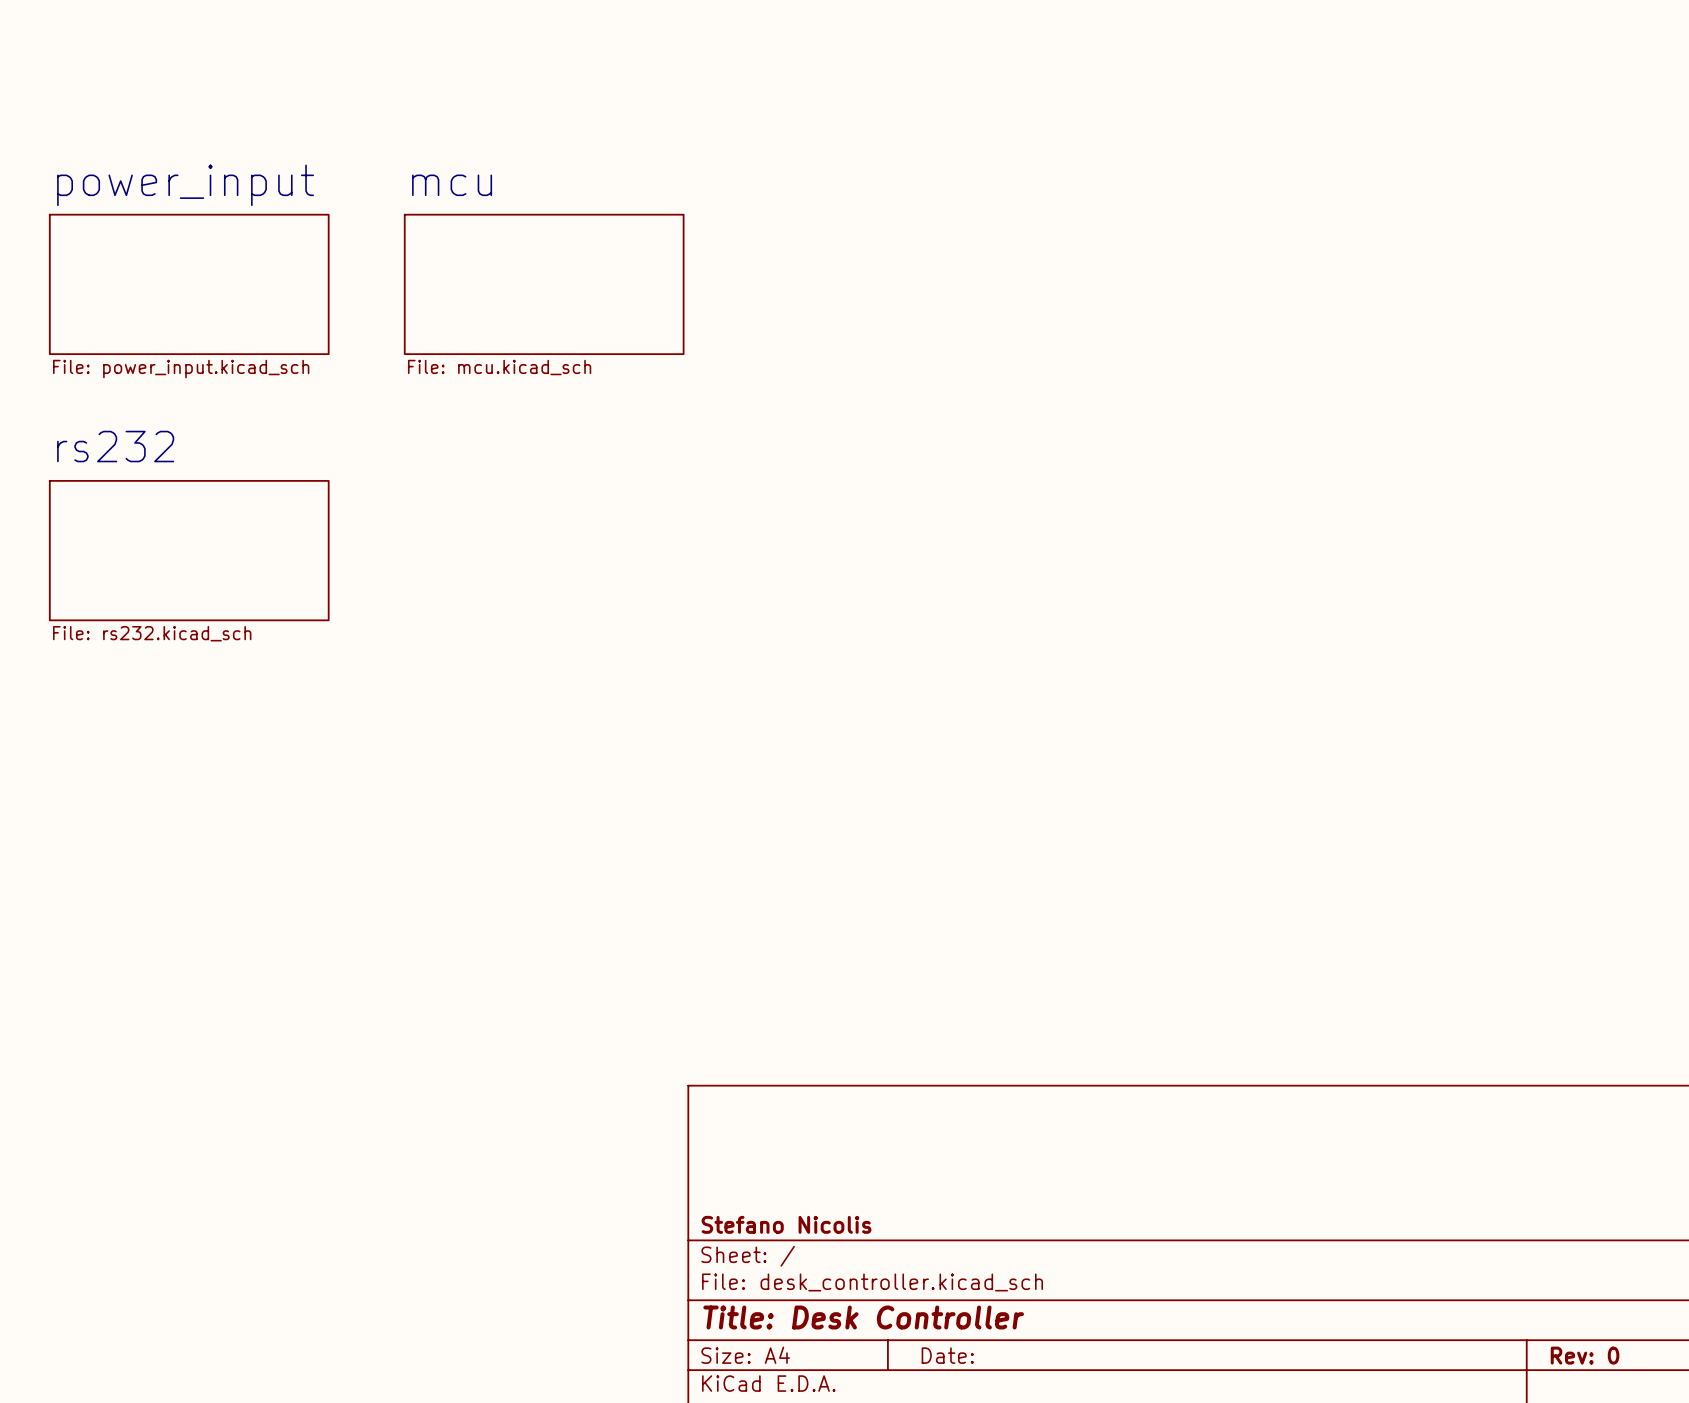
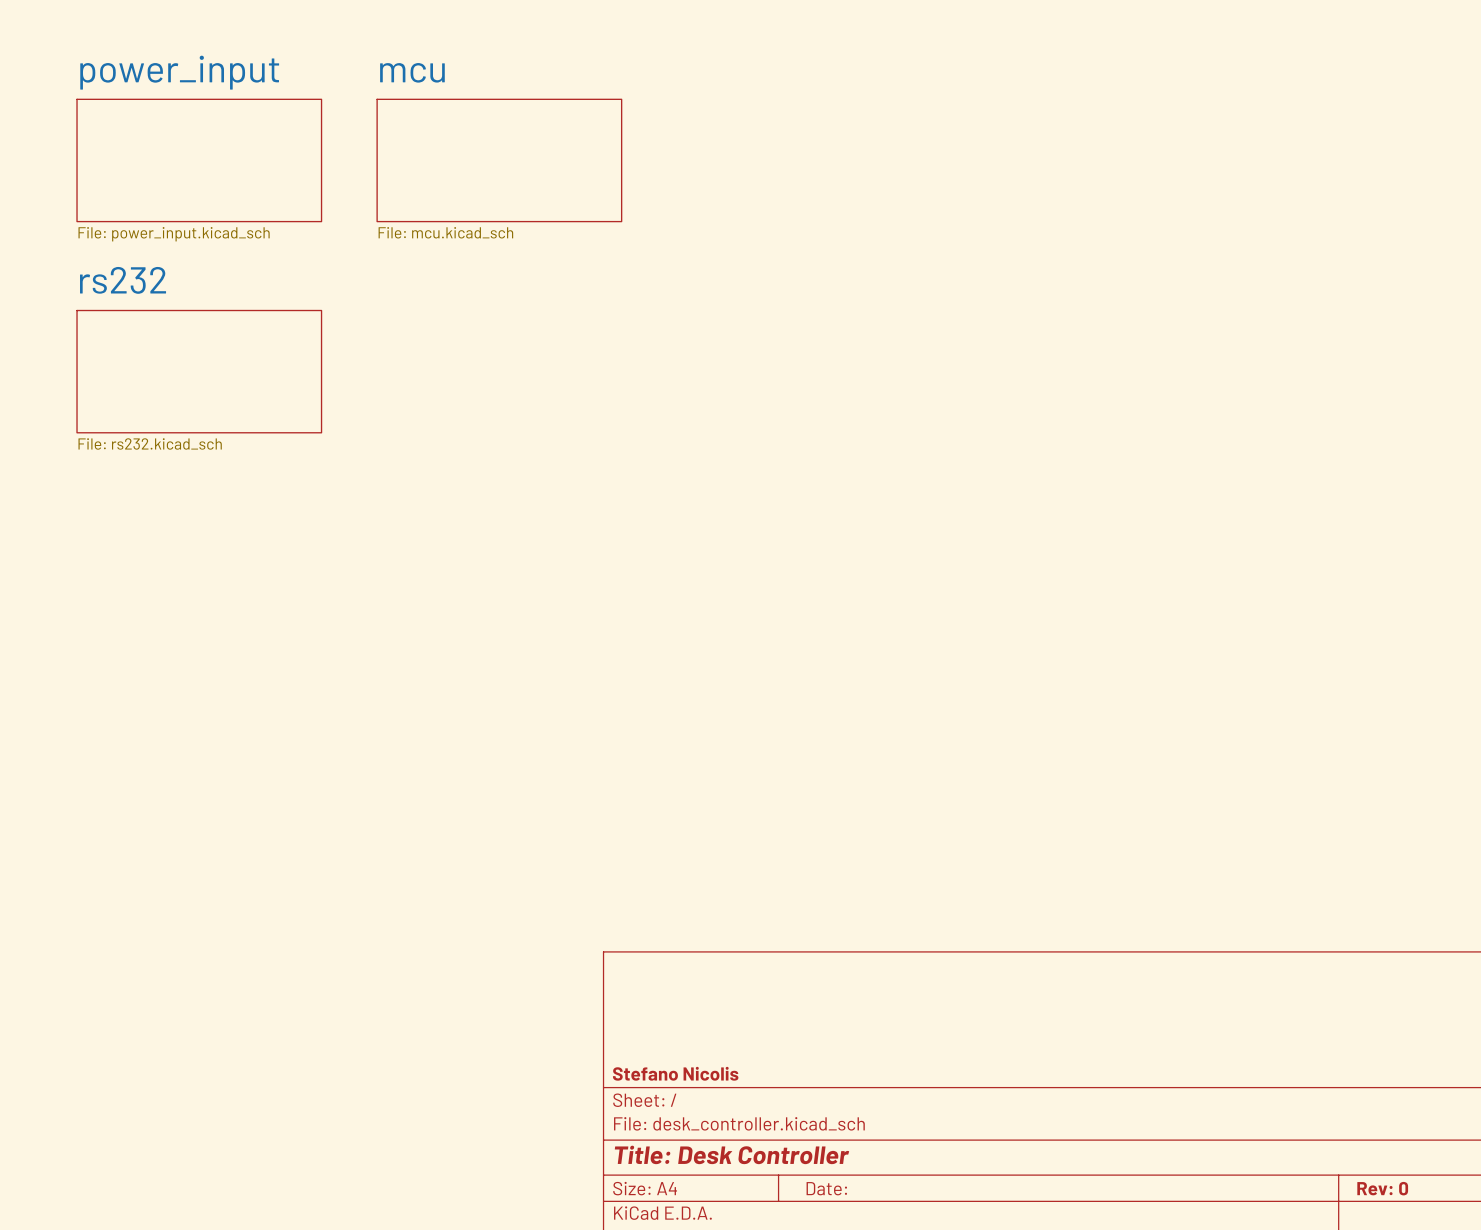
sheet power_input position: (189, 284) -> (199, 160)
sheet mcu position: (544, 284) -> (499, 160)
sheet rs232 position: (189, 550) -> (199, 371)

